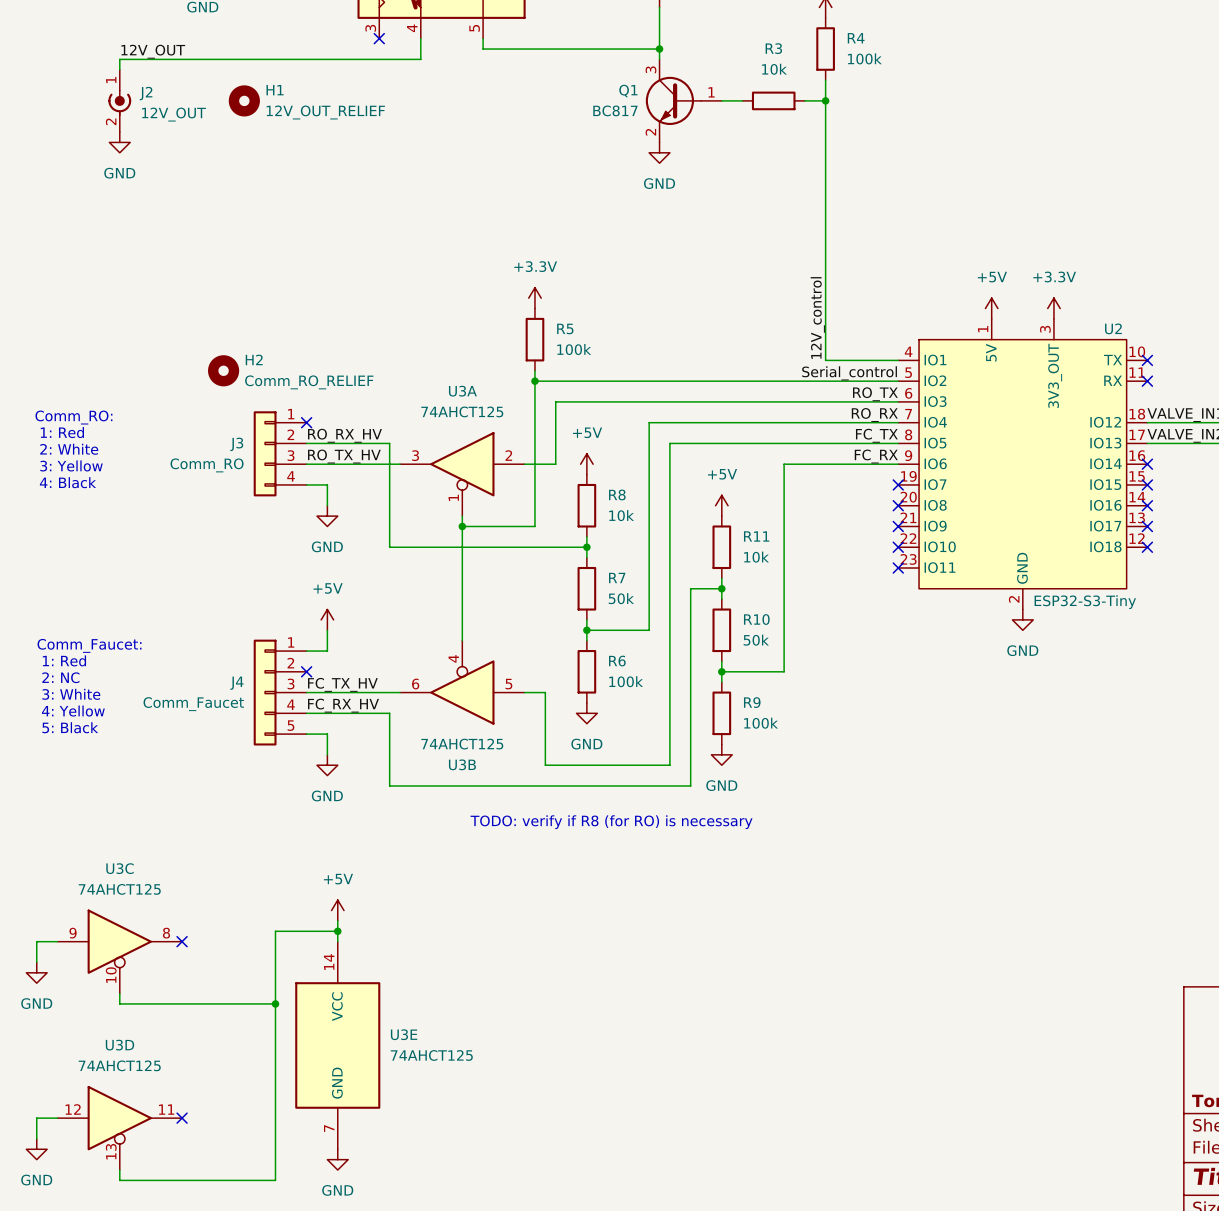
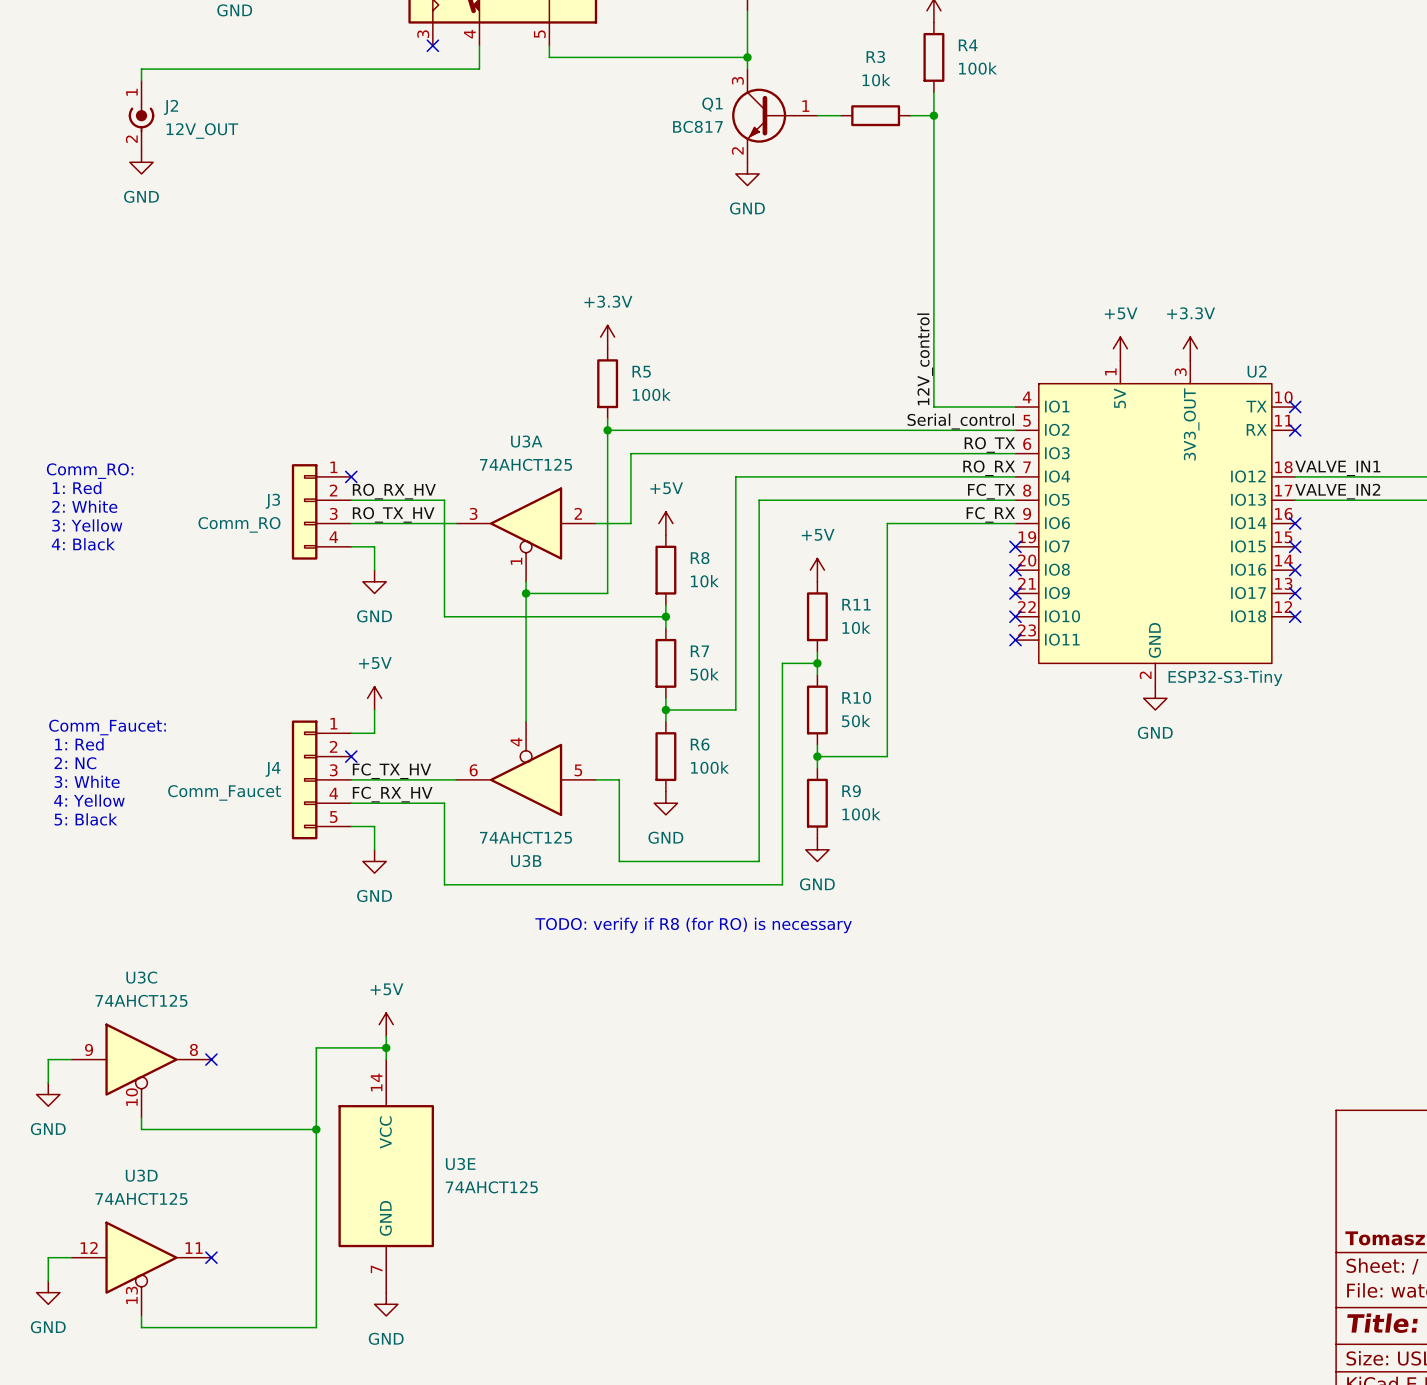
label: 12V_OUT (153, 51) -> none
H1: 12V_OUT_RELIEF (244, 100) -> none
H2: Comm_RO_RELIEF (223, 370) -> none

